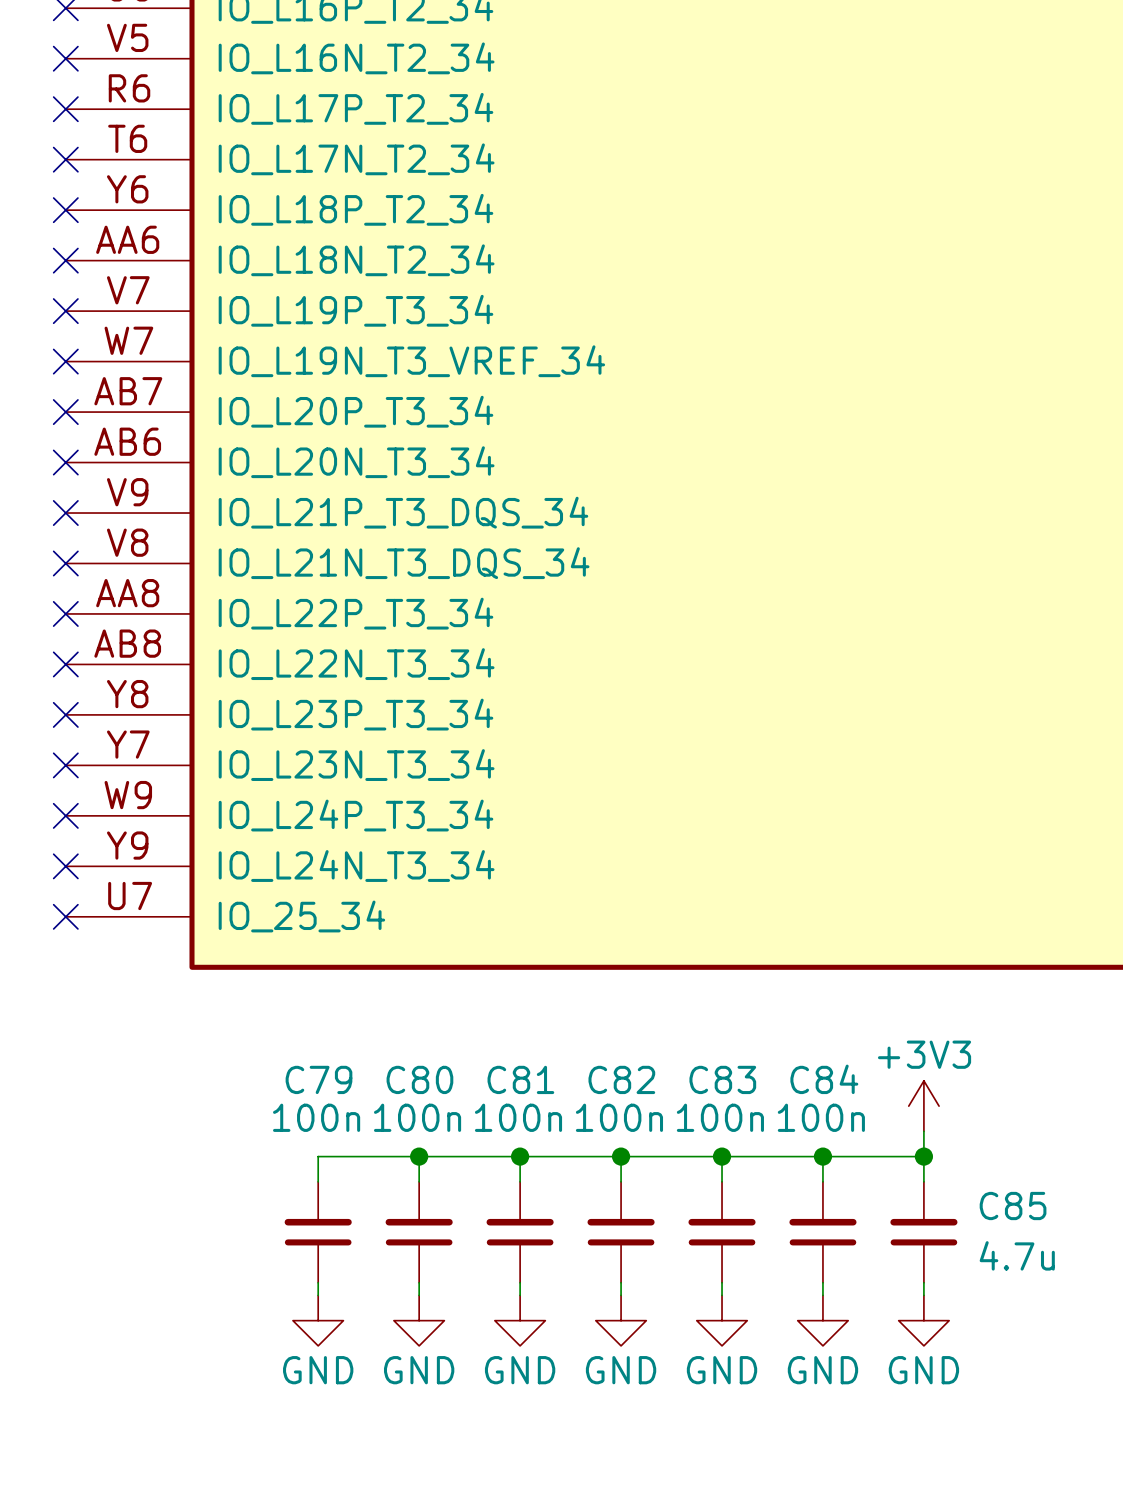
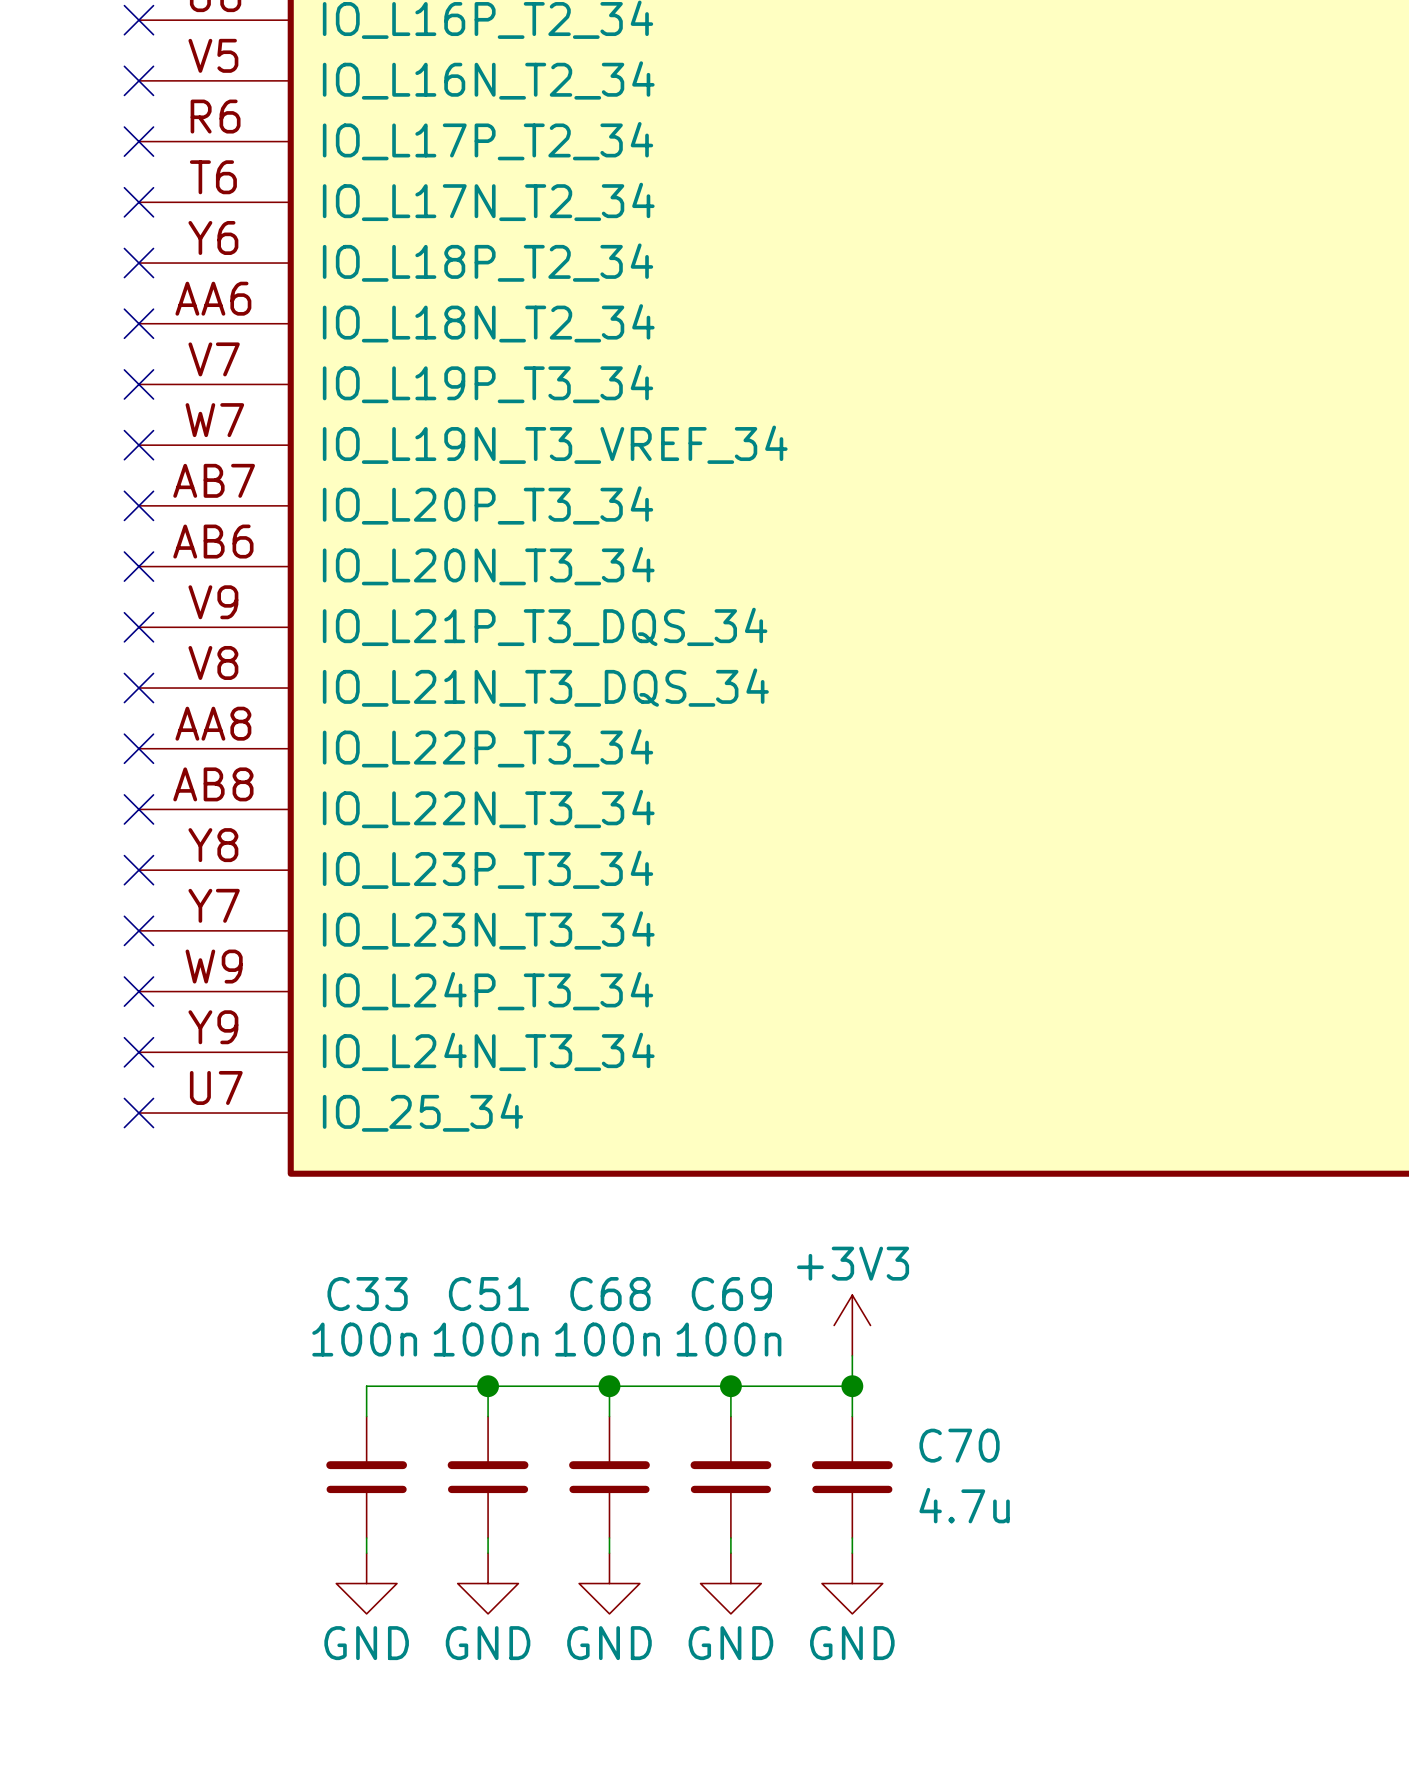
power symbol position: +3V3 (923, 1106) -> +3V3 (852, 1325)
wire: (923, 1131) (923, 1181) -> (852, 1355) (852, 1416)
junction: none -> (488, 1386)
junction: none -> (609, 1386)
junction: none -> (730, 1386)
wire: none -> (852, 1386) (366, 1386) (366, 1416)
junction: none -> (852, 1386)
wire: (419, 1156) (419, 1181) -> none
junction: (419, 1156) -> none
wire: (520, 1156) (520, 1181) -> none
junction: (520, 1156) -> none
wire: (621, 1156) (621, 1181) -> (488, 1386) (488, 1416)
junction: (621, 1156) -> none
wire: (722, 1156) (722, 1181) -> (609, 1386) (609, 1416)
junction: (722, 1156) -> none
wire: (822, 1156) (822, 1181) -> (730, 1386) (730, 1416)
junction: (822, 1156) -> none
wire: (923, 1156) (318, 1156) (318, 1181) -> none
junction: (923, 1156) -> none
C33: none -> 100n (366, 1477)
C51: none -> 100n (488, 1477)
C68: none -> 100n (609, 1477)
C69: none -> 100n (730, 1477)
C70: none -> 4.7u (852, 1477)
C79: 100n (318, 1232) -> none
C80: 100n (419, 1232) -> none
C81: 100n (520, 1232) -> none
C82: 100n (621, 1232) -> none
C83: 100n (722, 1232) -> none
C84: 100n (822, 1232) -> none
C85: 4.7u (923, 1232) -> none
wire: (318, 1282) (318, 1295) -> none
wire: (419, 1282) (419, 1295) -> none
wire: (520, 1282) (520, 1295) -> (366, 1538) (366, 1553)
wire: (621, 1282) (621, 1295) -> (488, 1538) (488, 1553)
wire: (722, 1282) (722, 1295) -> (609, 1538) (609, 1553)
wire: (822, 1282) (822, 1295) -> (730, 1538) (730, 1553)
wire: (923, 1282) (923, 1295) -> (852, 1538) (852, 1553)
power symbol: none -> GND (366, 1583)
power symbol: none -> GND (488, 1583)
power symbol: none -> GND (609, 1583)
power symbol: none -> GND (730, 1583)
power symbol: none -> GND (852, 1583)
power symbol: GND (318, 1320) -> none
power symbol: GND (419, 1320) -> none
power symbol: GND (520, 1320) -> none
power symbol: GND (621, 1320) -> none
power symbol: GND (722, 1320) -> none
power symbol: GND (822, 1320) -> none
power symbol: GND (923, 1320) -> none

